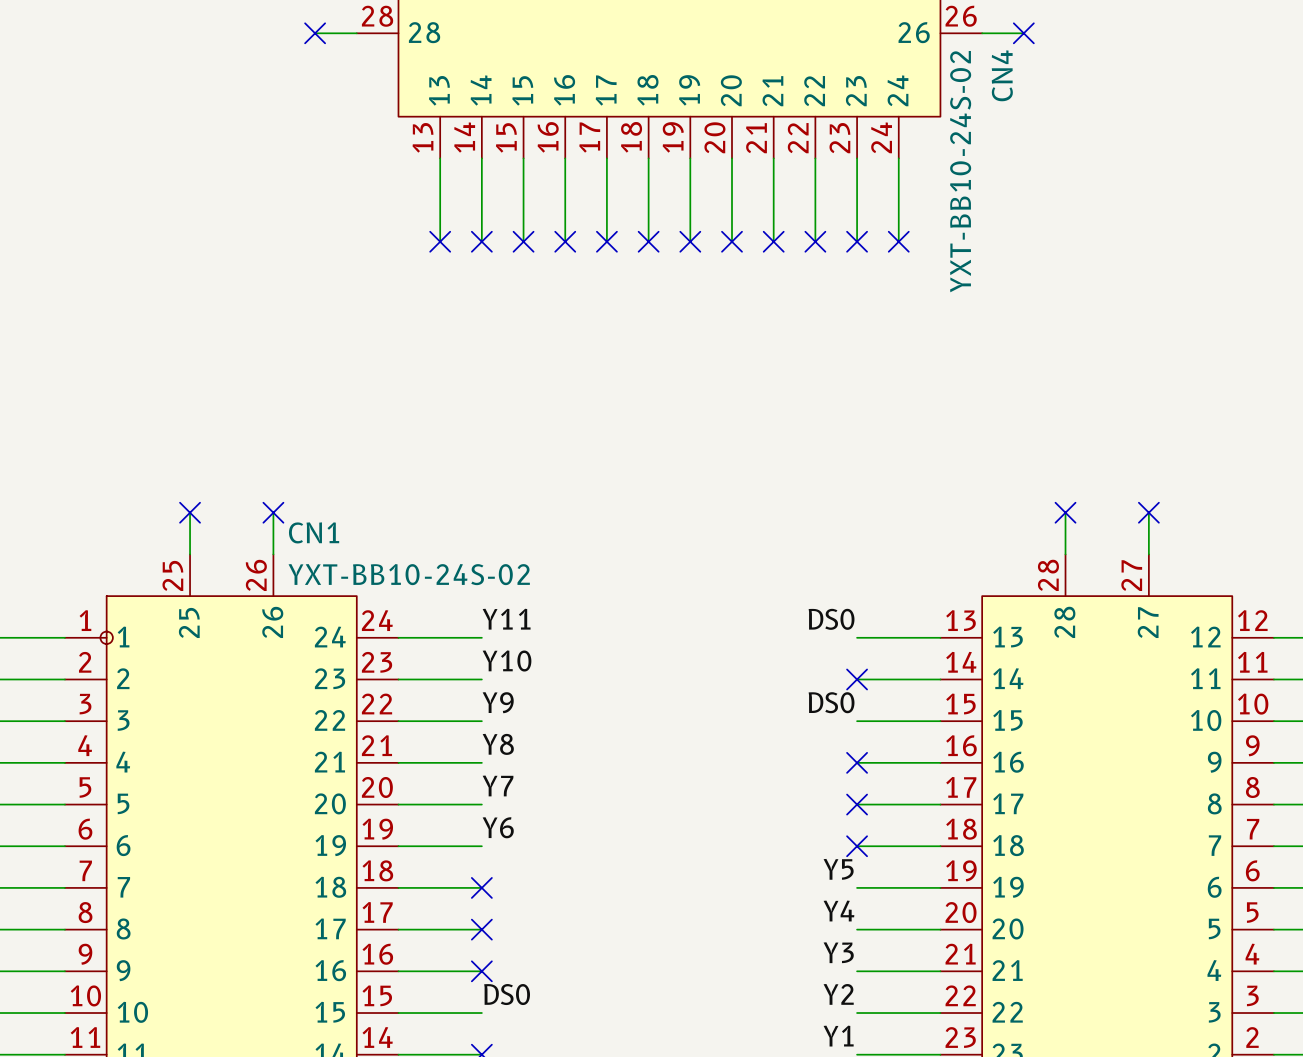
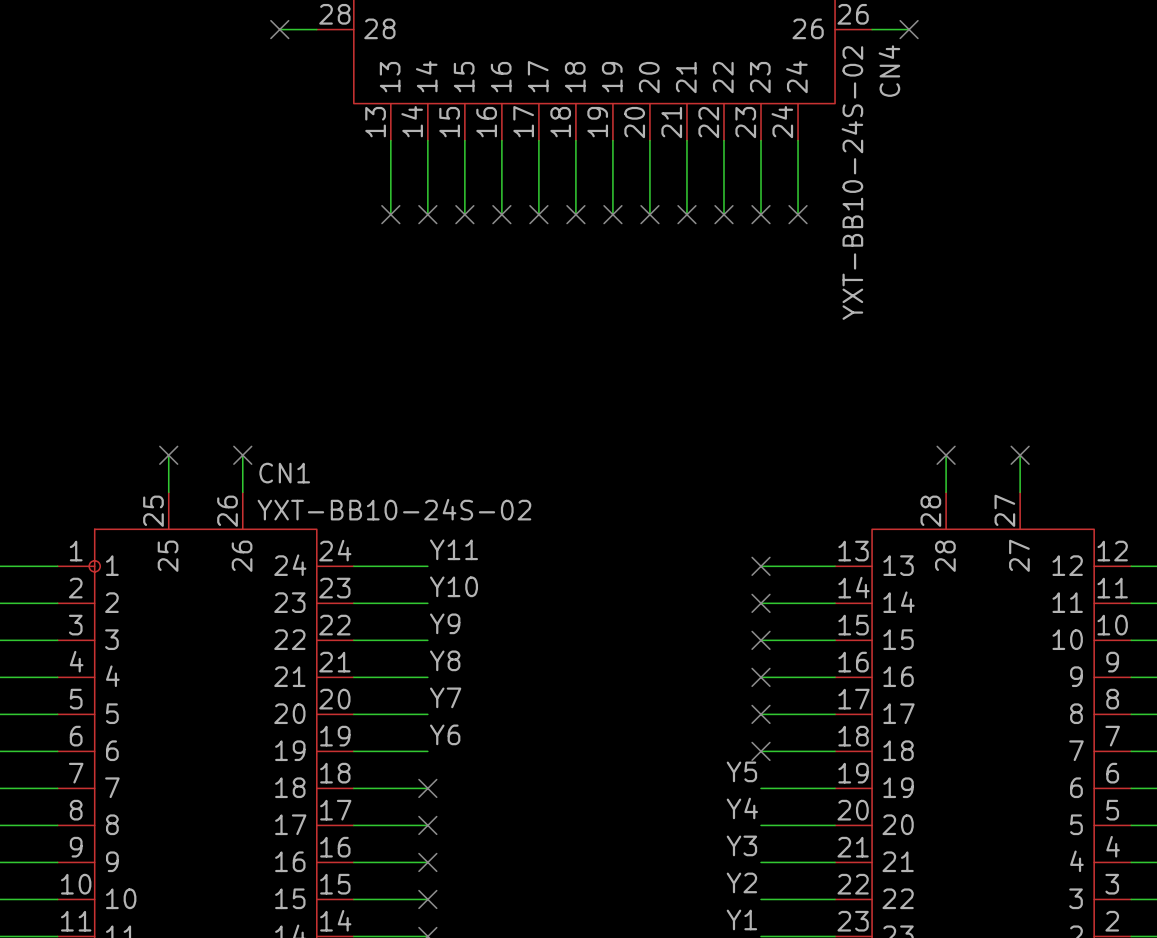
label: DS0 (831, 619) -> none
no-connect mark: none -> (761, 566)
label: DS0 (831, 702) -> none
no-connect mark: none -> (761, 640)
label: DS0 (507, 994) -> none
no-connect mark: none -> (427, 899)

